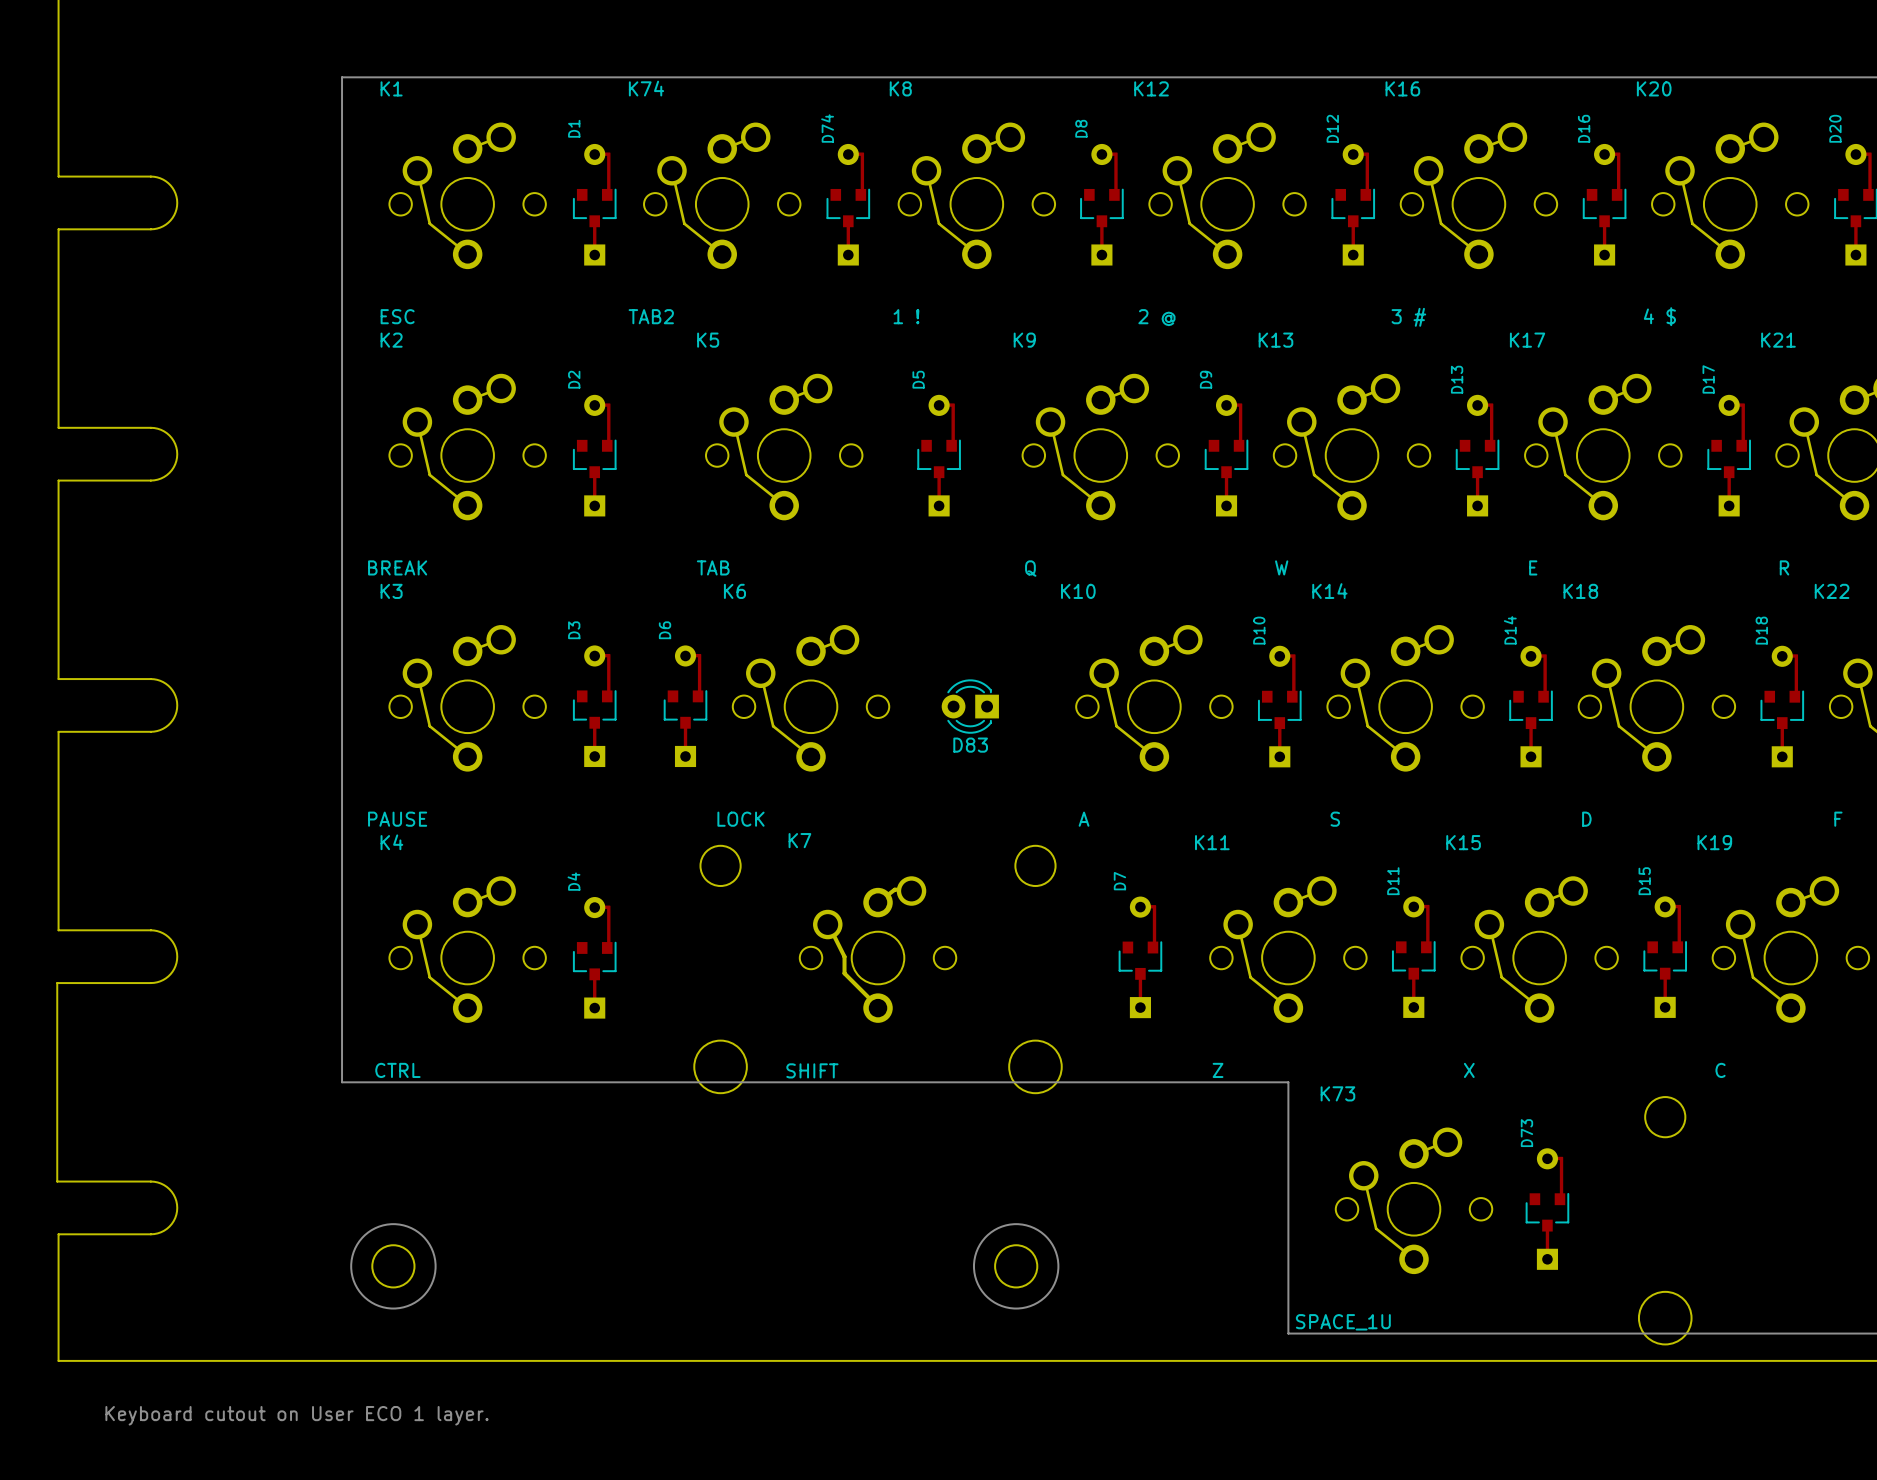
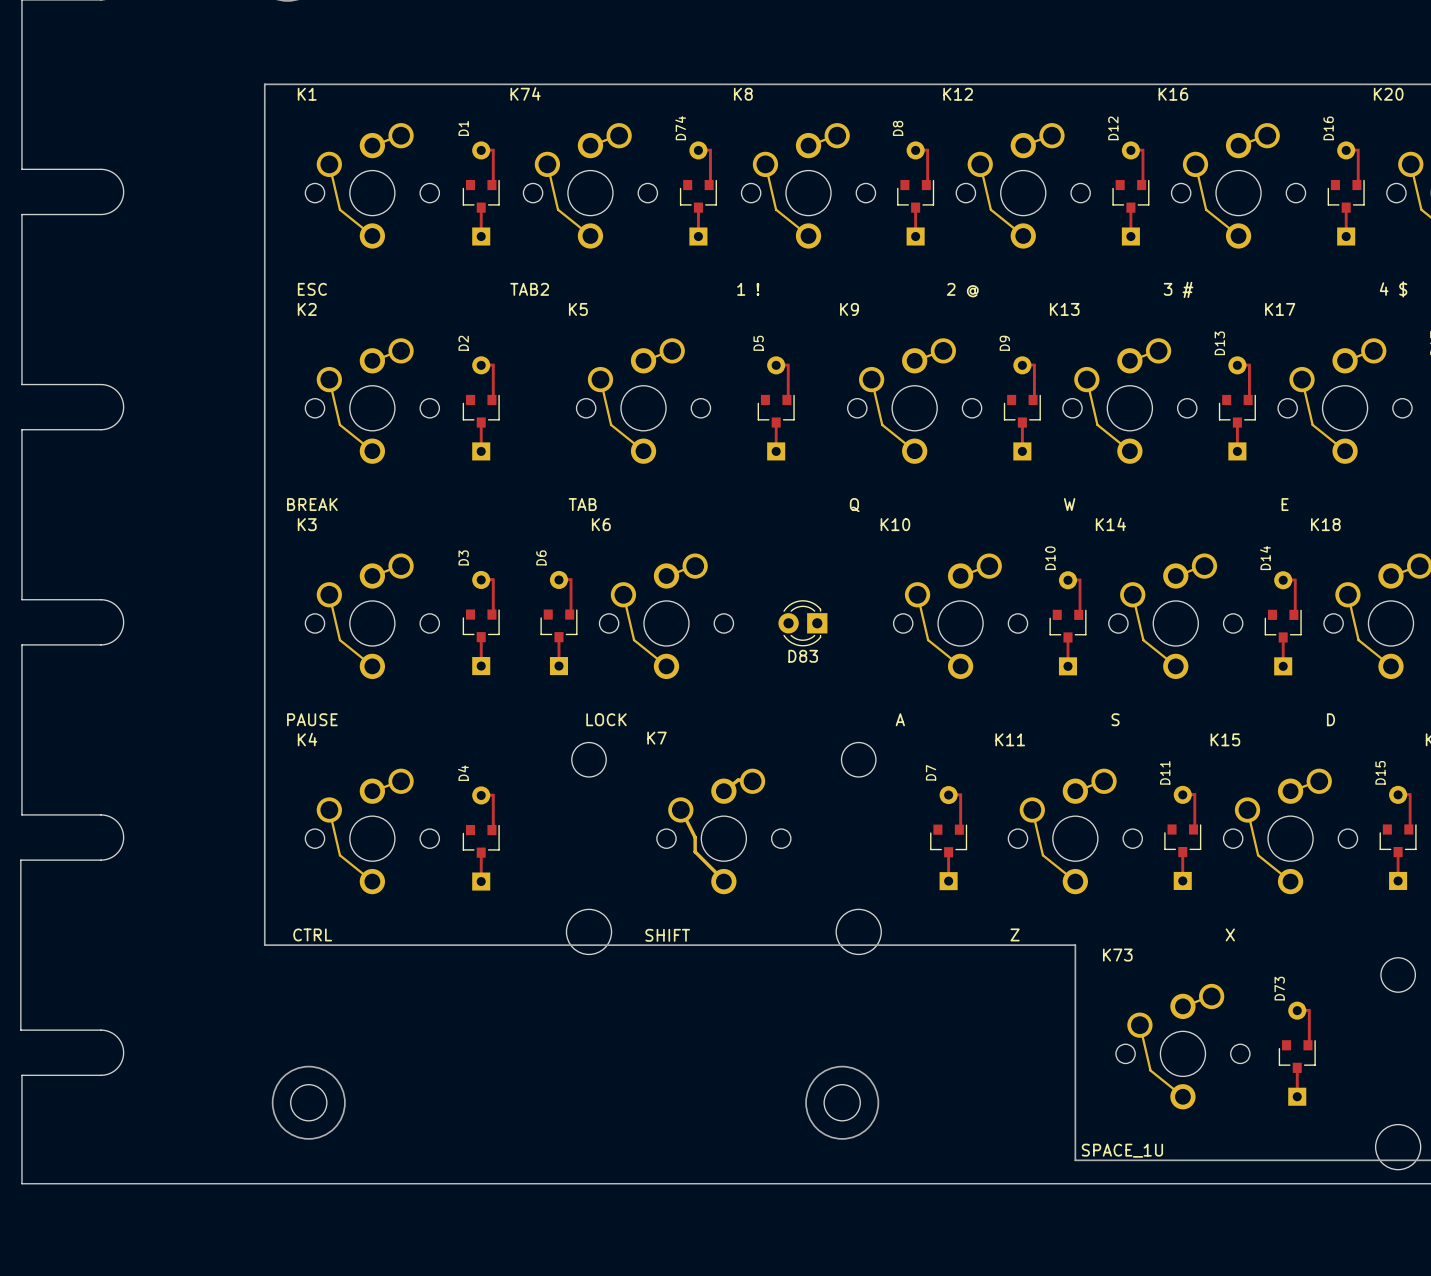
text: Keyboard cutout on User ECO 1 layer. (297, 1415) -> none

